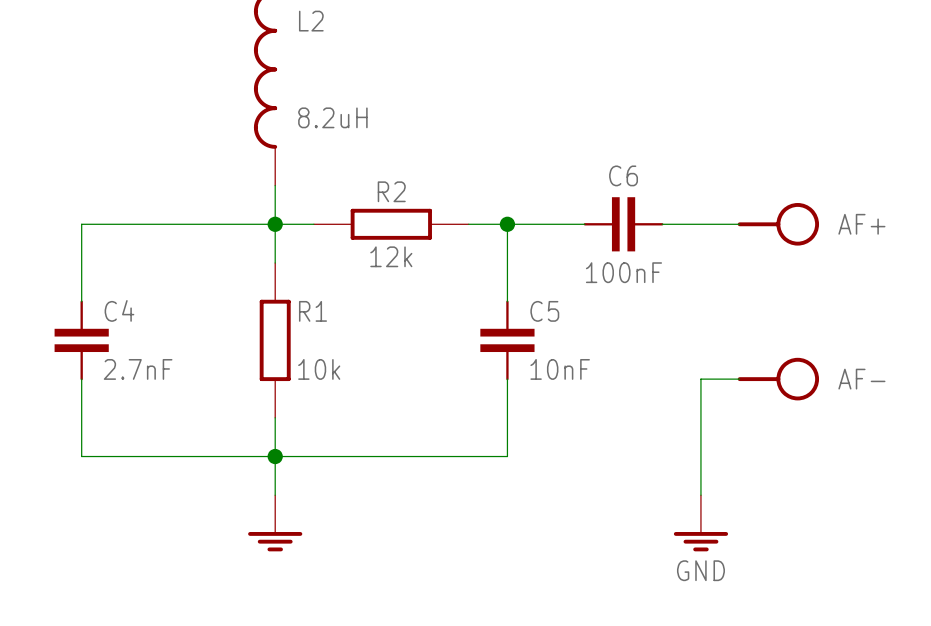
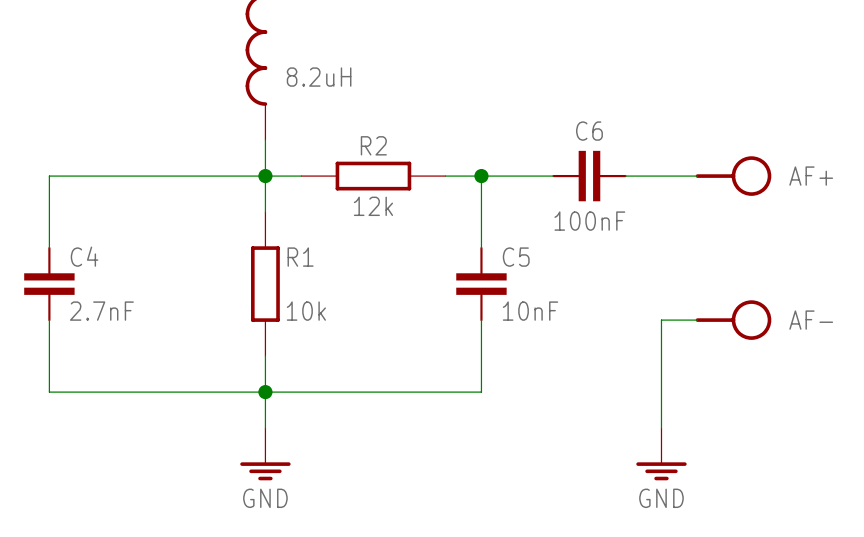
wire: (81, 224) (81, 301) -> (85, 176) (49, 176) (49, 248)
C4 position: (81, 340) -> (49, 284)
wire: (81, 379) (81, 456) -> (49, 320) (49, 392) (85, 392)
part text: none -> GND (265, 498)

